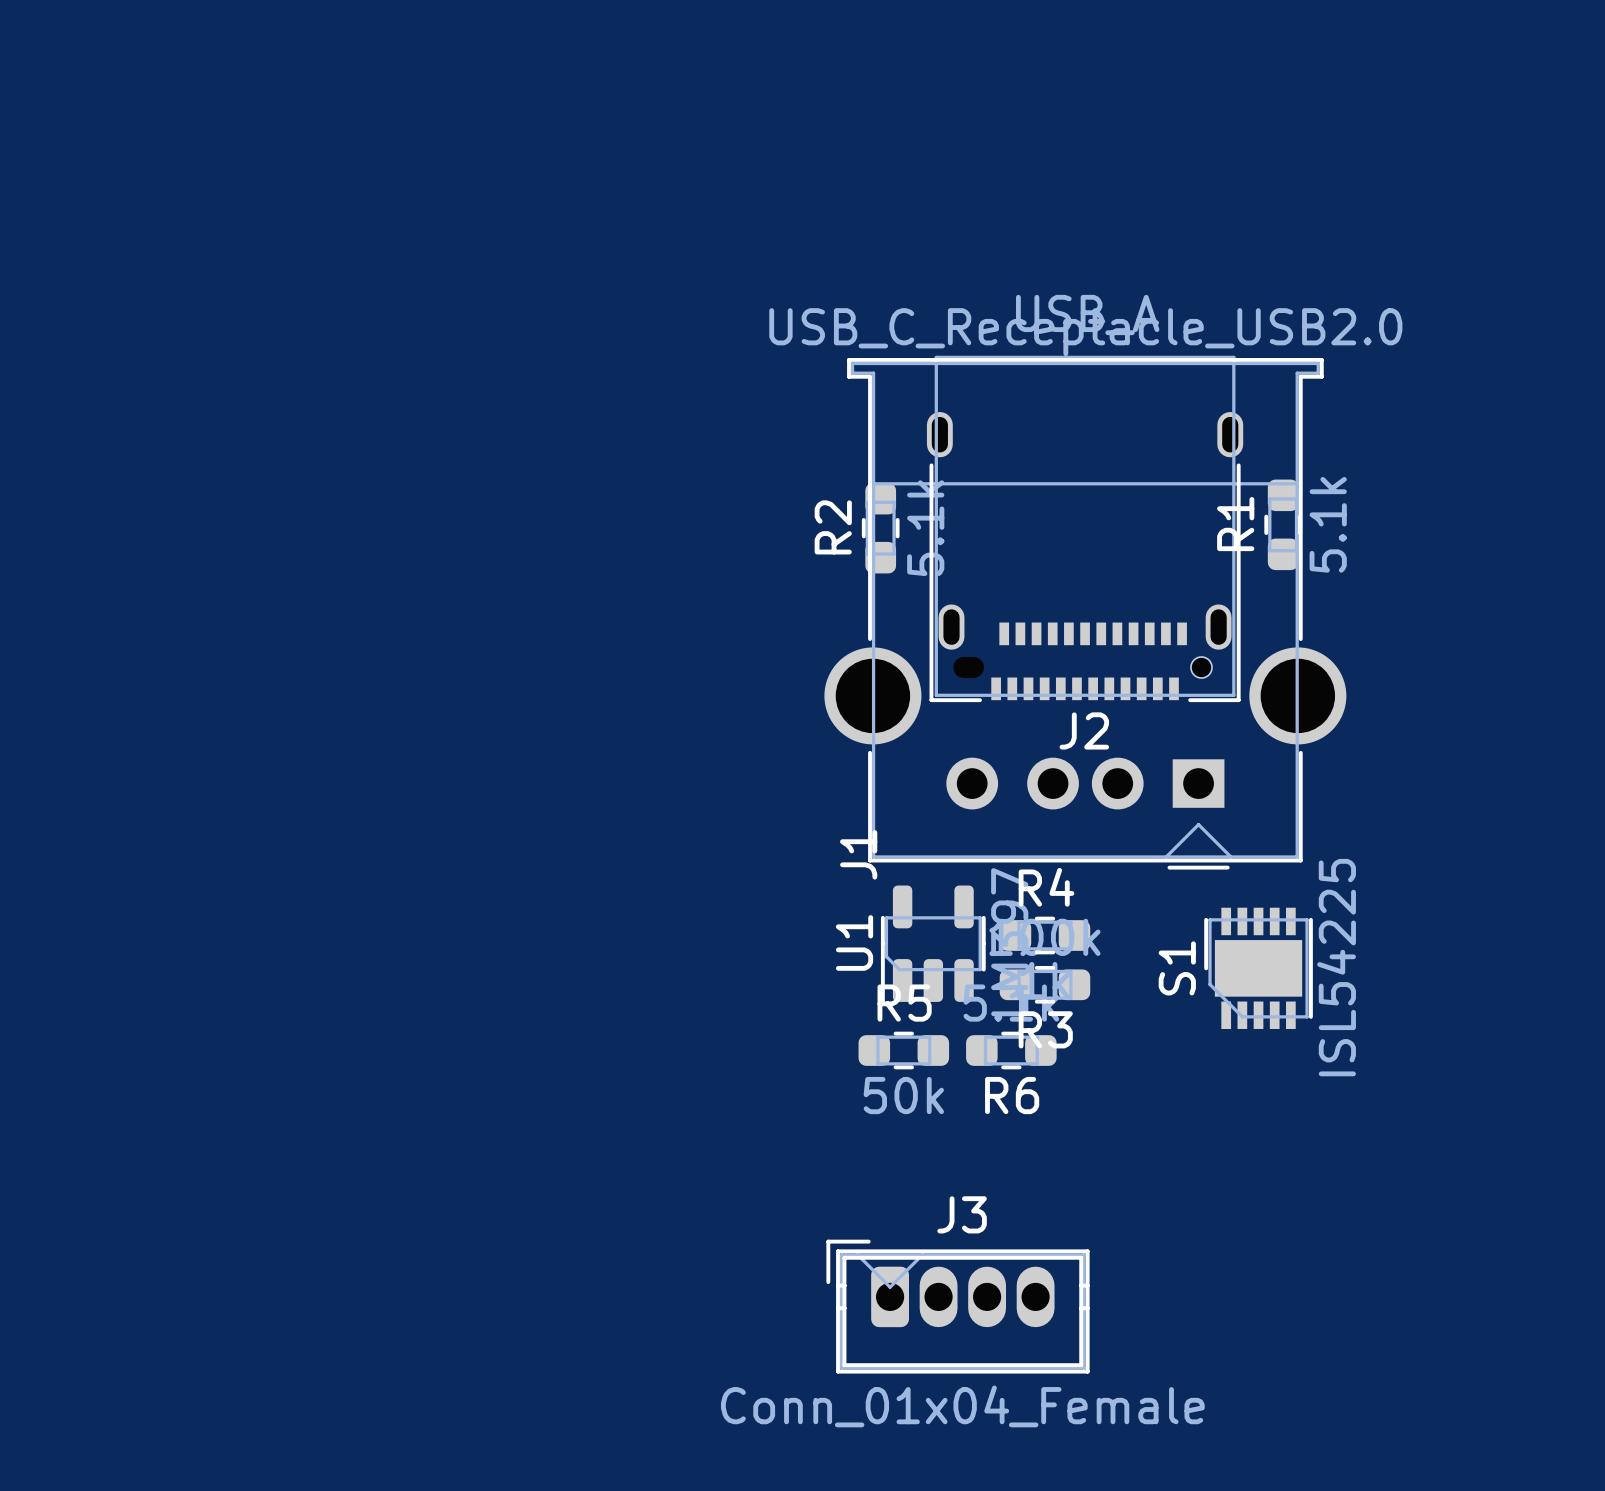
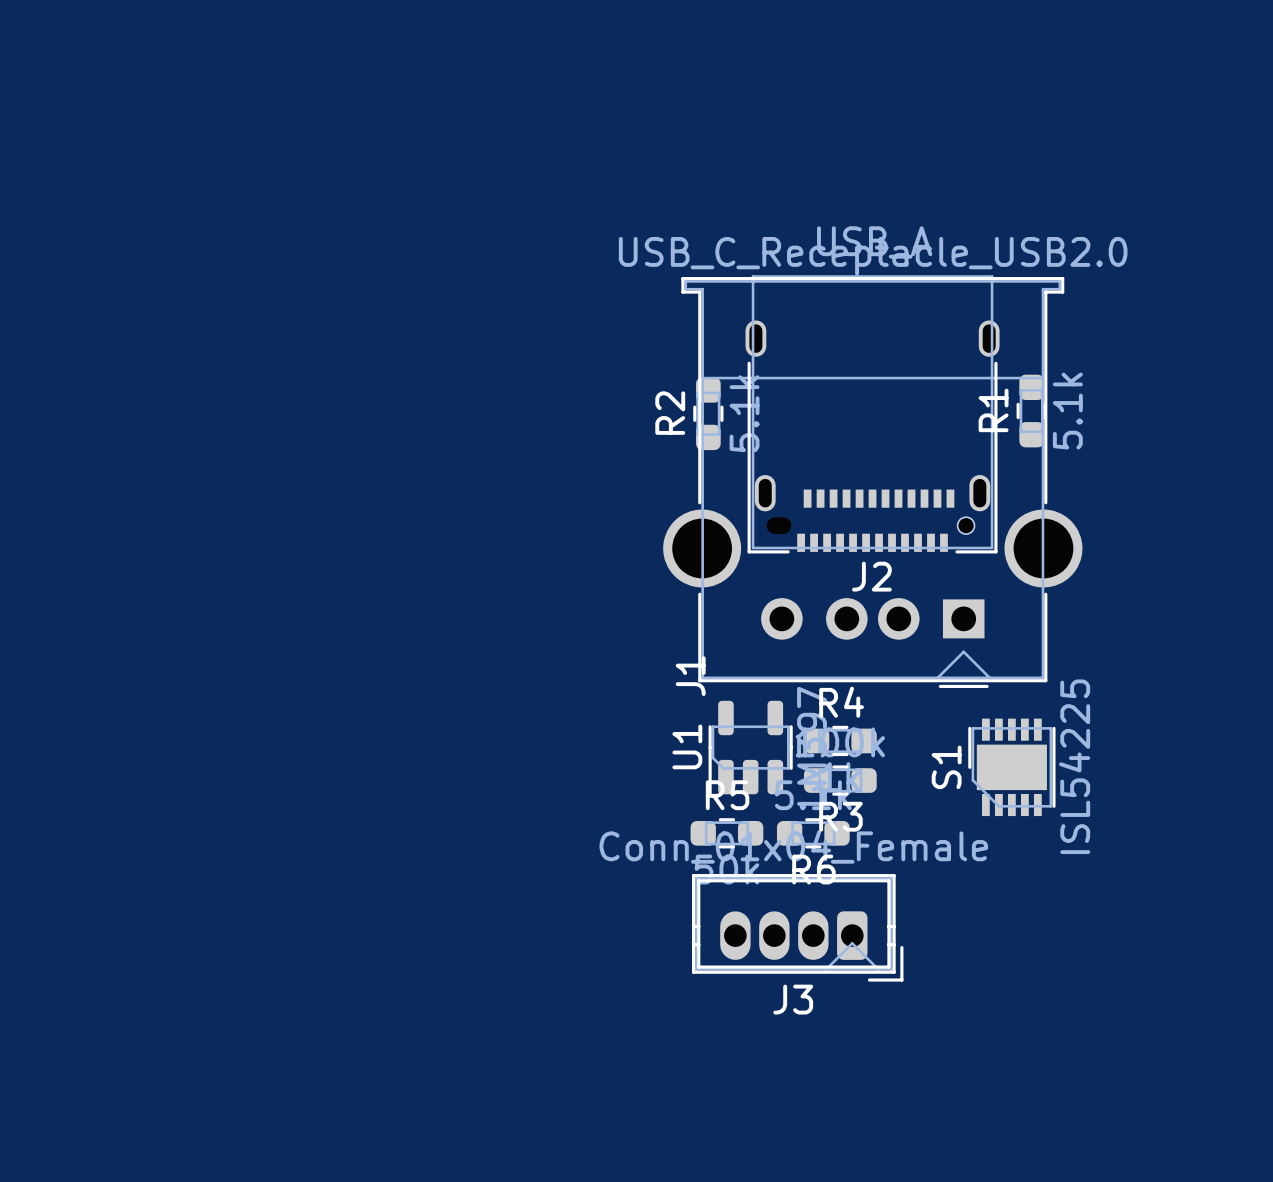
J3 rotation: 0° (957, 1306) -> 180° (797, 927)

